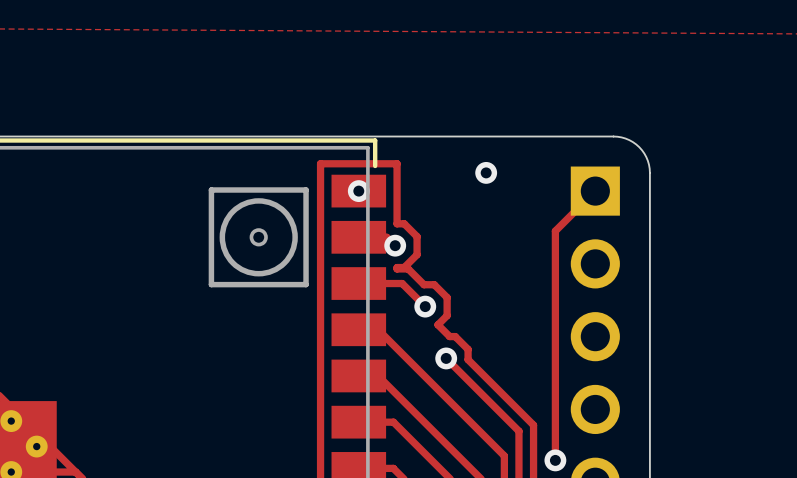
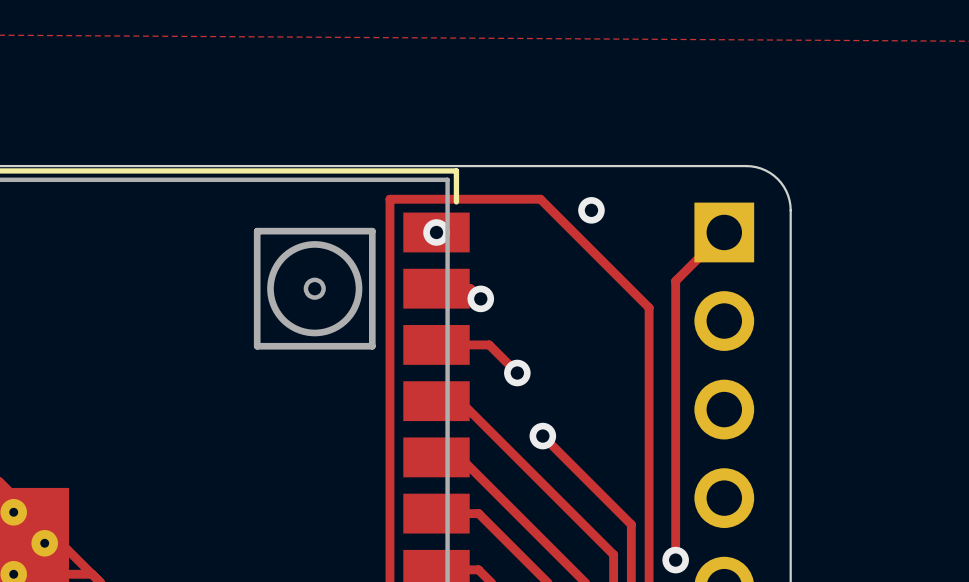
track: (397, 163) (397, 223) (404, 223) (417, 236) (417, 254) (404, 267) (397, 268) (408, 268) (424, 284) (434, 284) (447, 297) (447, 315) (437, 324) (449, 336) (455, 336) (468, 349) (468, 359) (533, 425) -> (483, 199) (540, 199) (649, 307) (649, 517)

